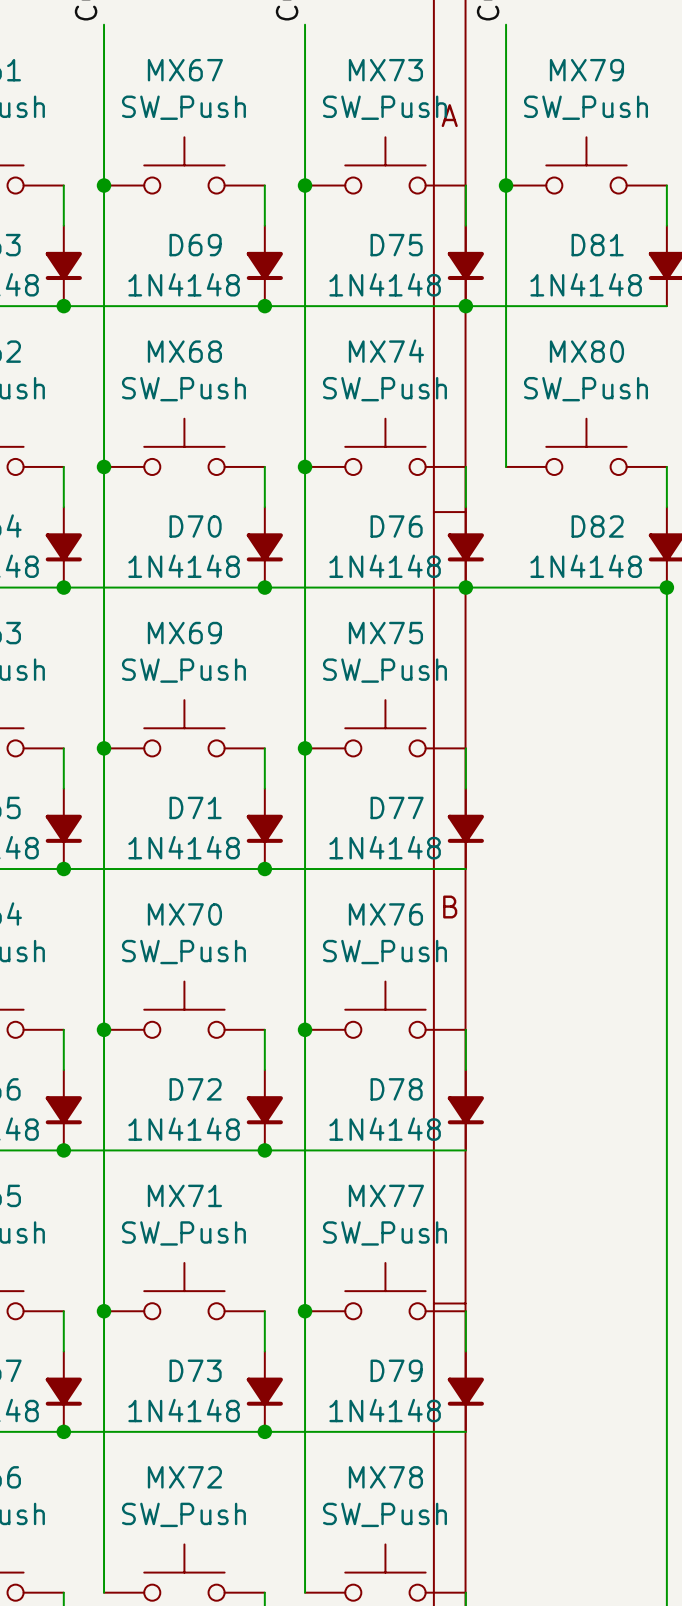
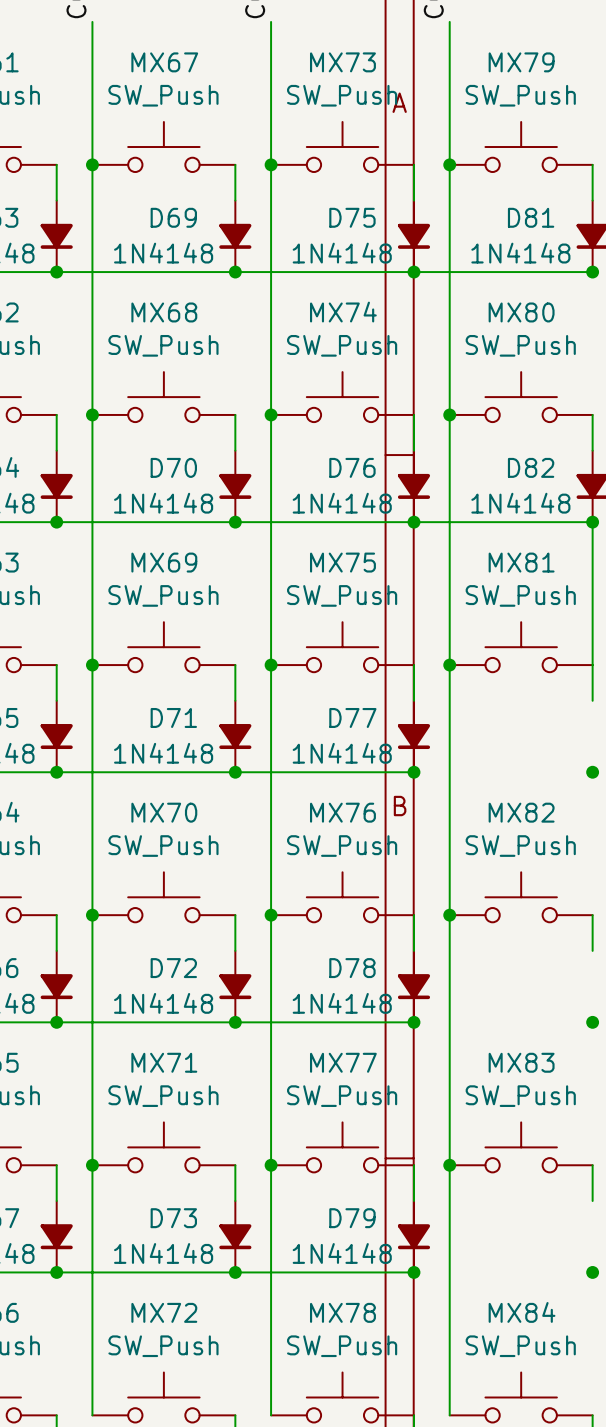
junction: none -> (592, 272)
wire: none -> (449, 414) (449, 1415)
junction: none -> (449, 414)
MX81: none -> SW_Push (521, 647)
junction: none -> (449, 665)
wire: (666, 788) (666, 1029) -> none
junction: none -> (413, 772)
junction: none -> (592, 772)
MX82: none -> SW_Push (521, 897)
junction: none -> (449, 915)
wire: (666, 1070) (666, 1311) -> none
junction: none -> (413, 1022)
junction: none -> (592, 1022)
MX83: none -> SW_Push (521, 1147)
junction: none -> (449, 1165)
wire: (666, 1351) (666, 1592) -> none
junction: none -> (413, 1272)
junction: none -> (592, 1272)
MX84: none -> SW_Push (521, 1397)

